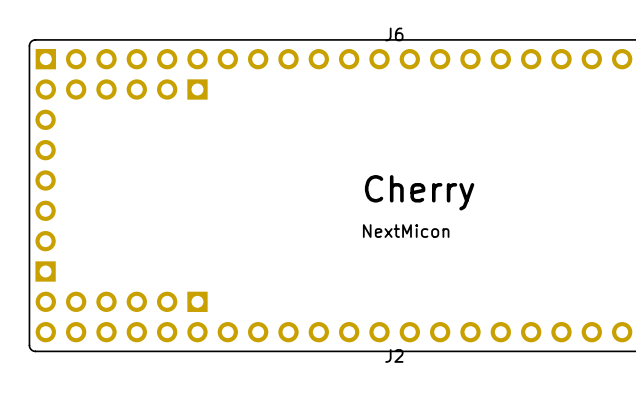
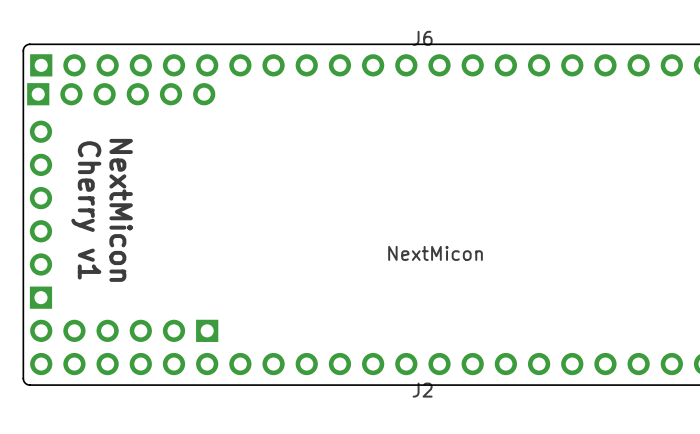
part rotation: 0° (121, 89) -> 180° (121, 94)
text: none -> Cherry v1 (86, 210)
text: none -> NextMicon (121, 210)
text: Cherry (419, 192) -> none

